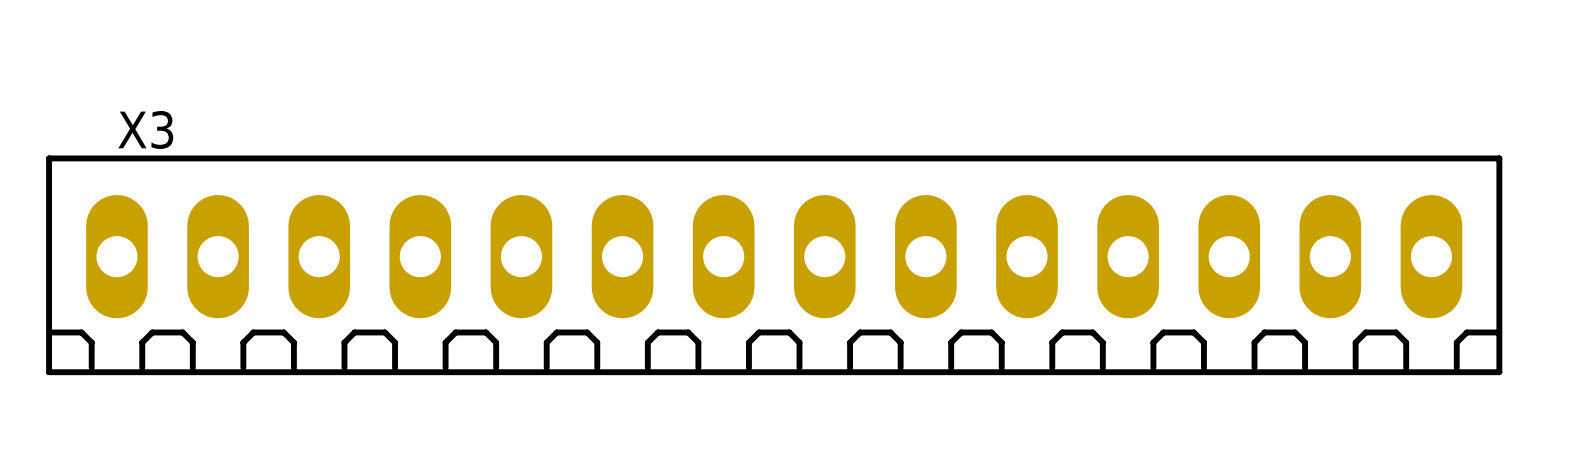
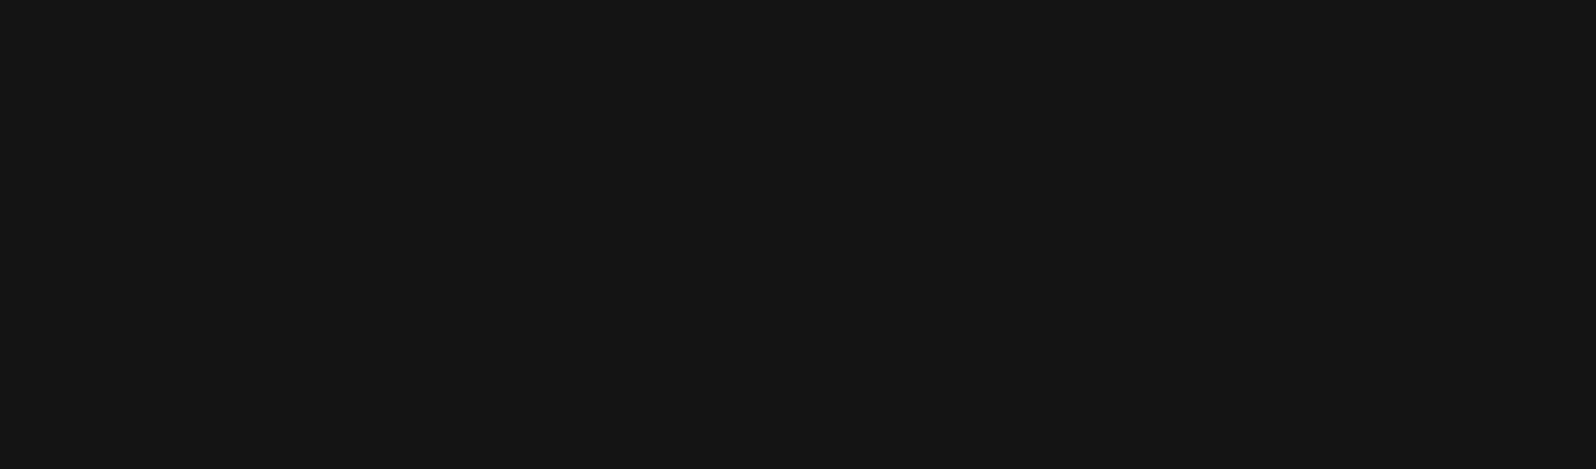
X3: (774, 265) -> none

